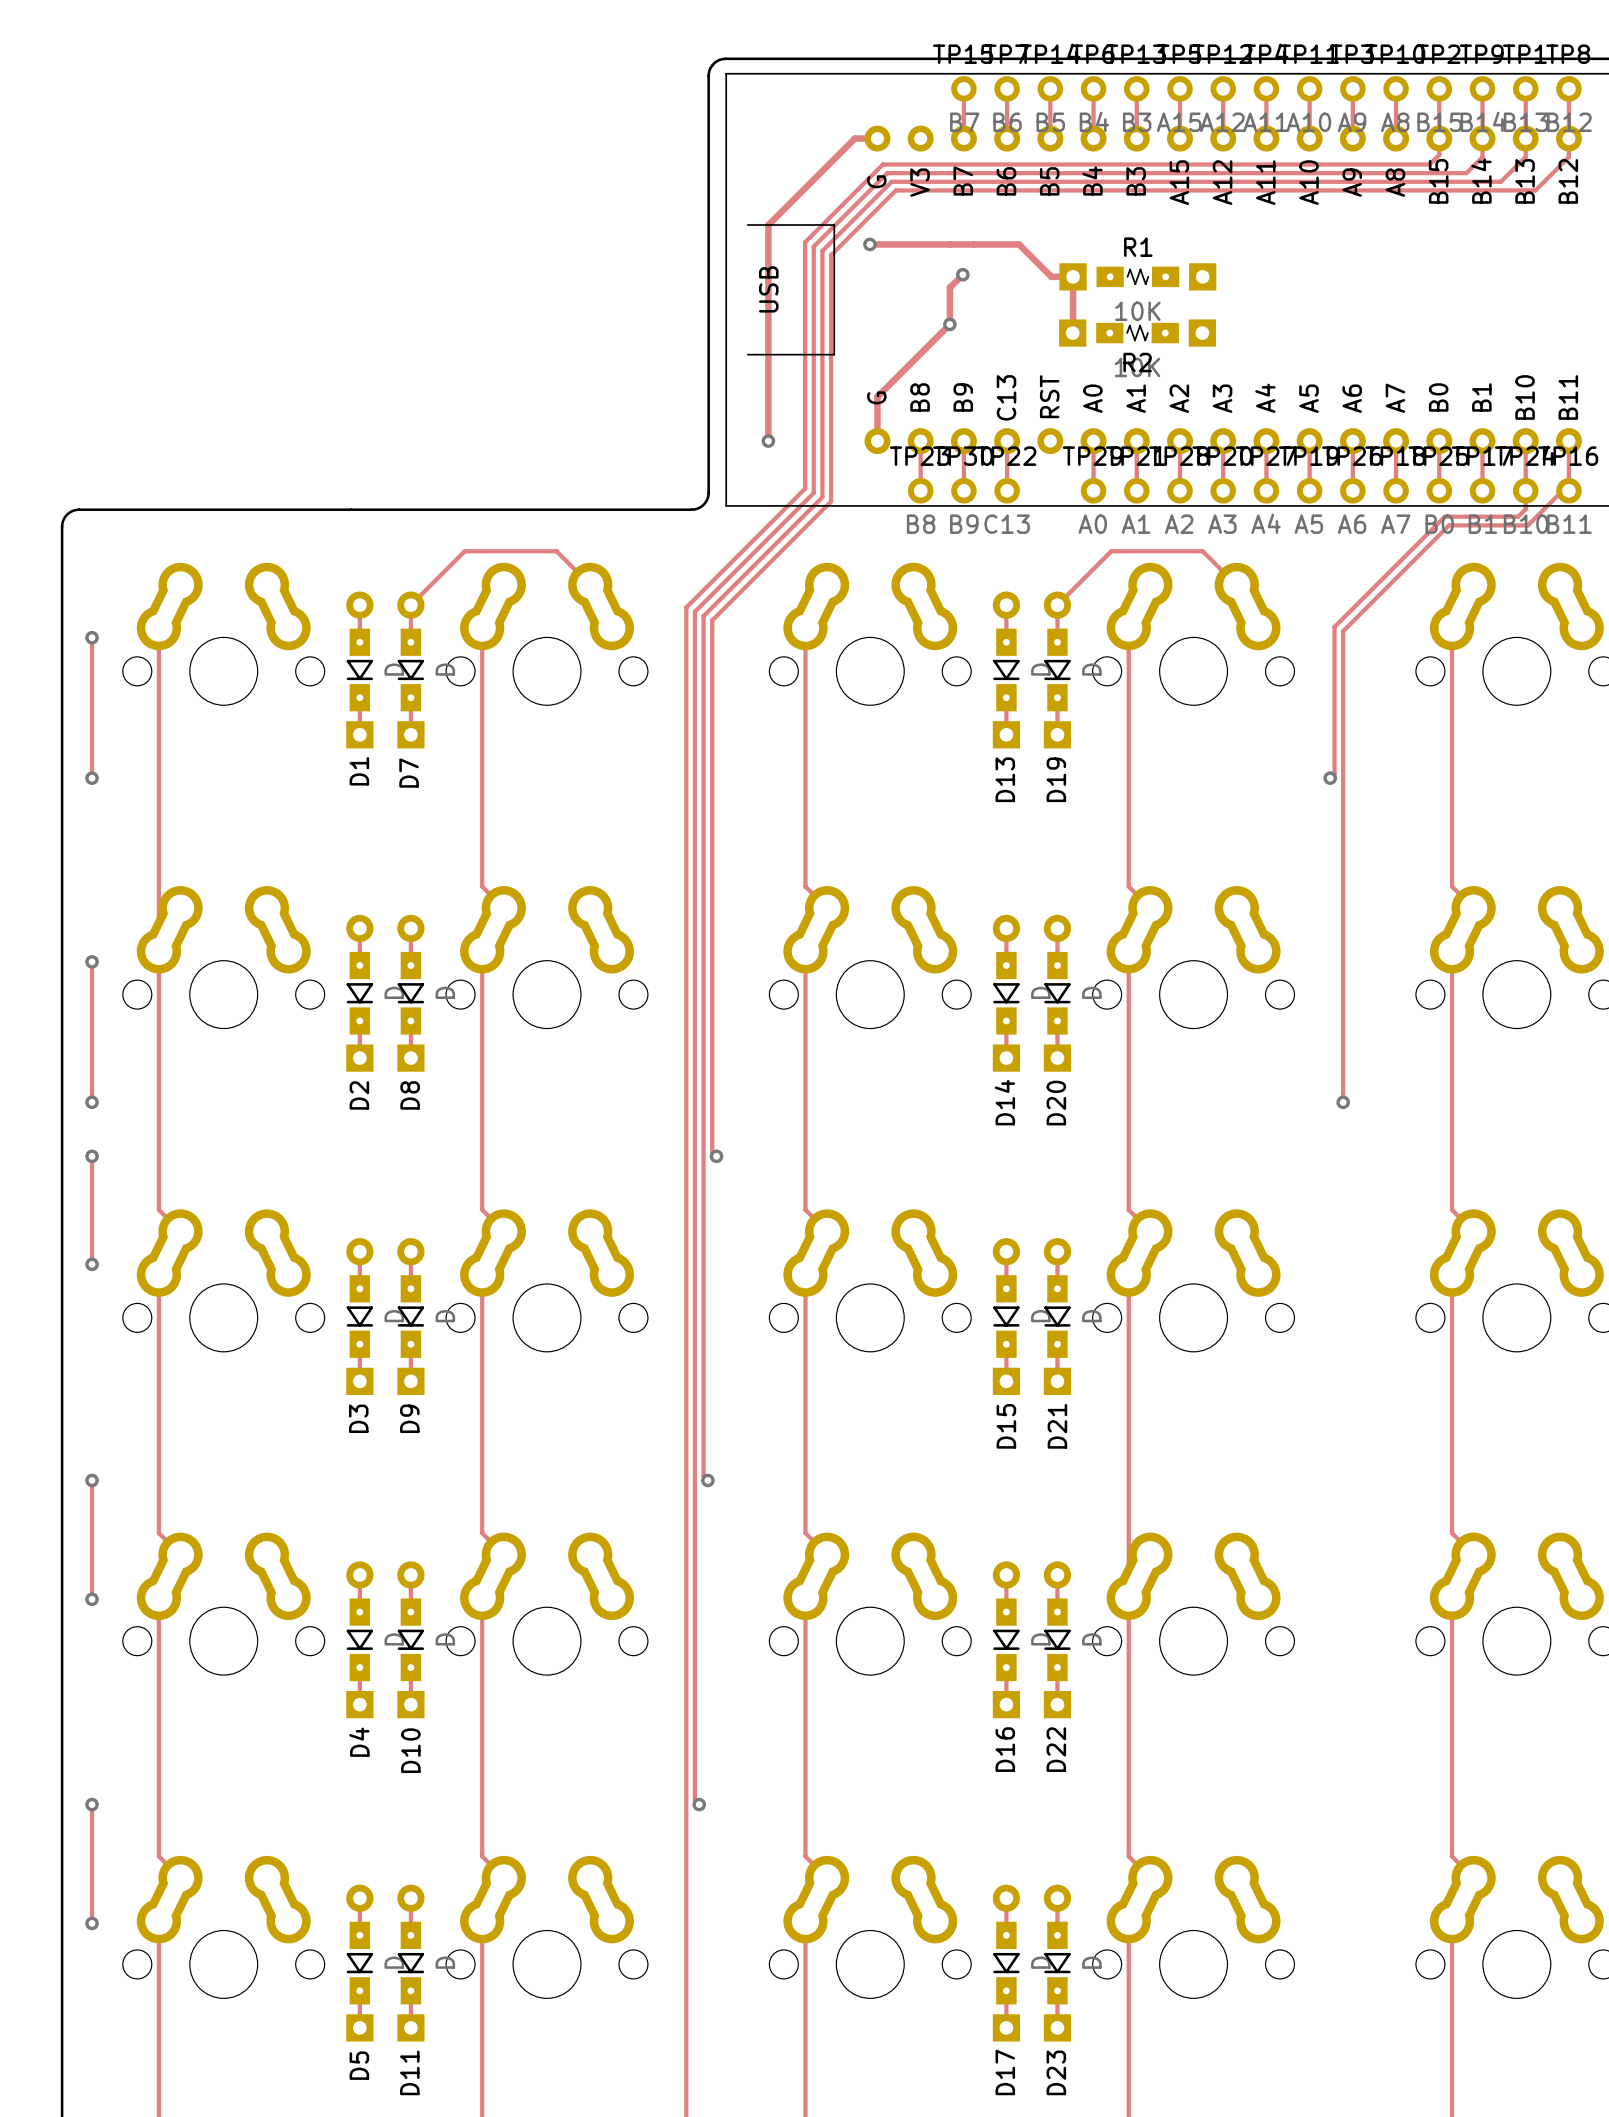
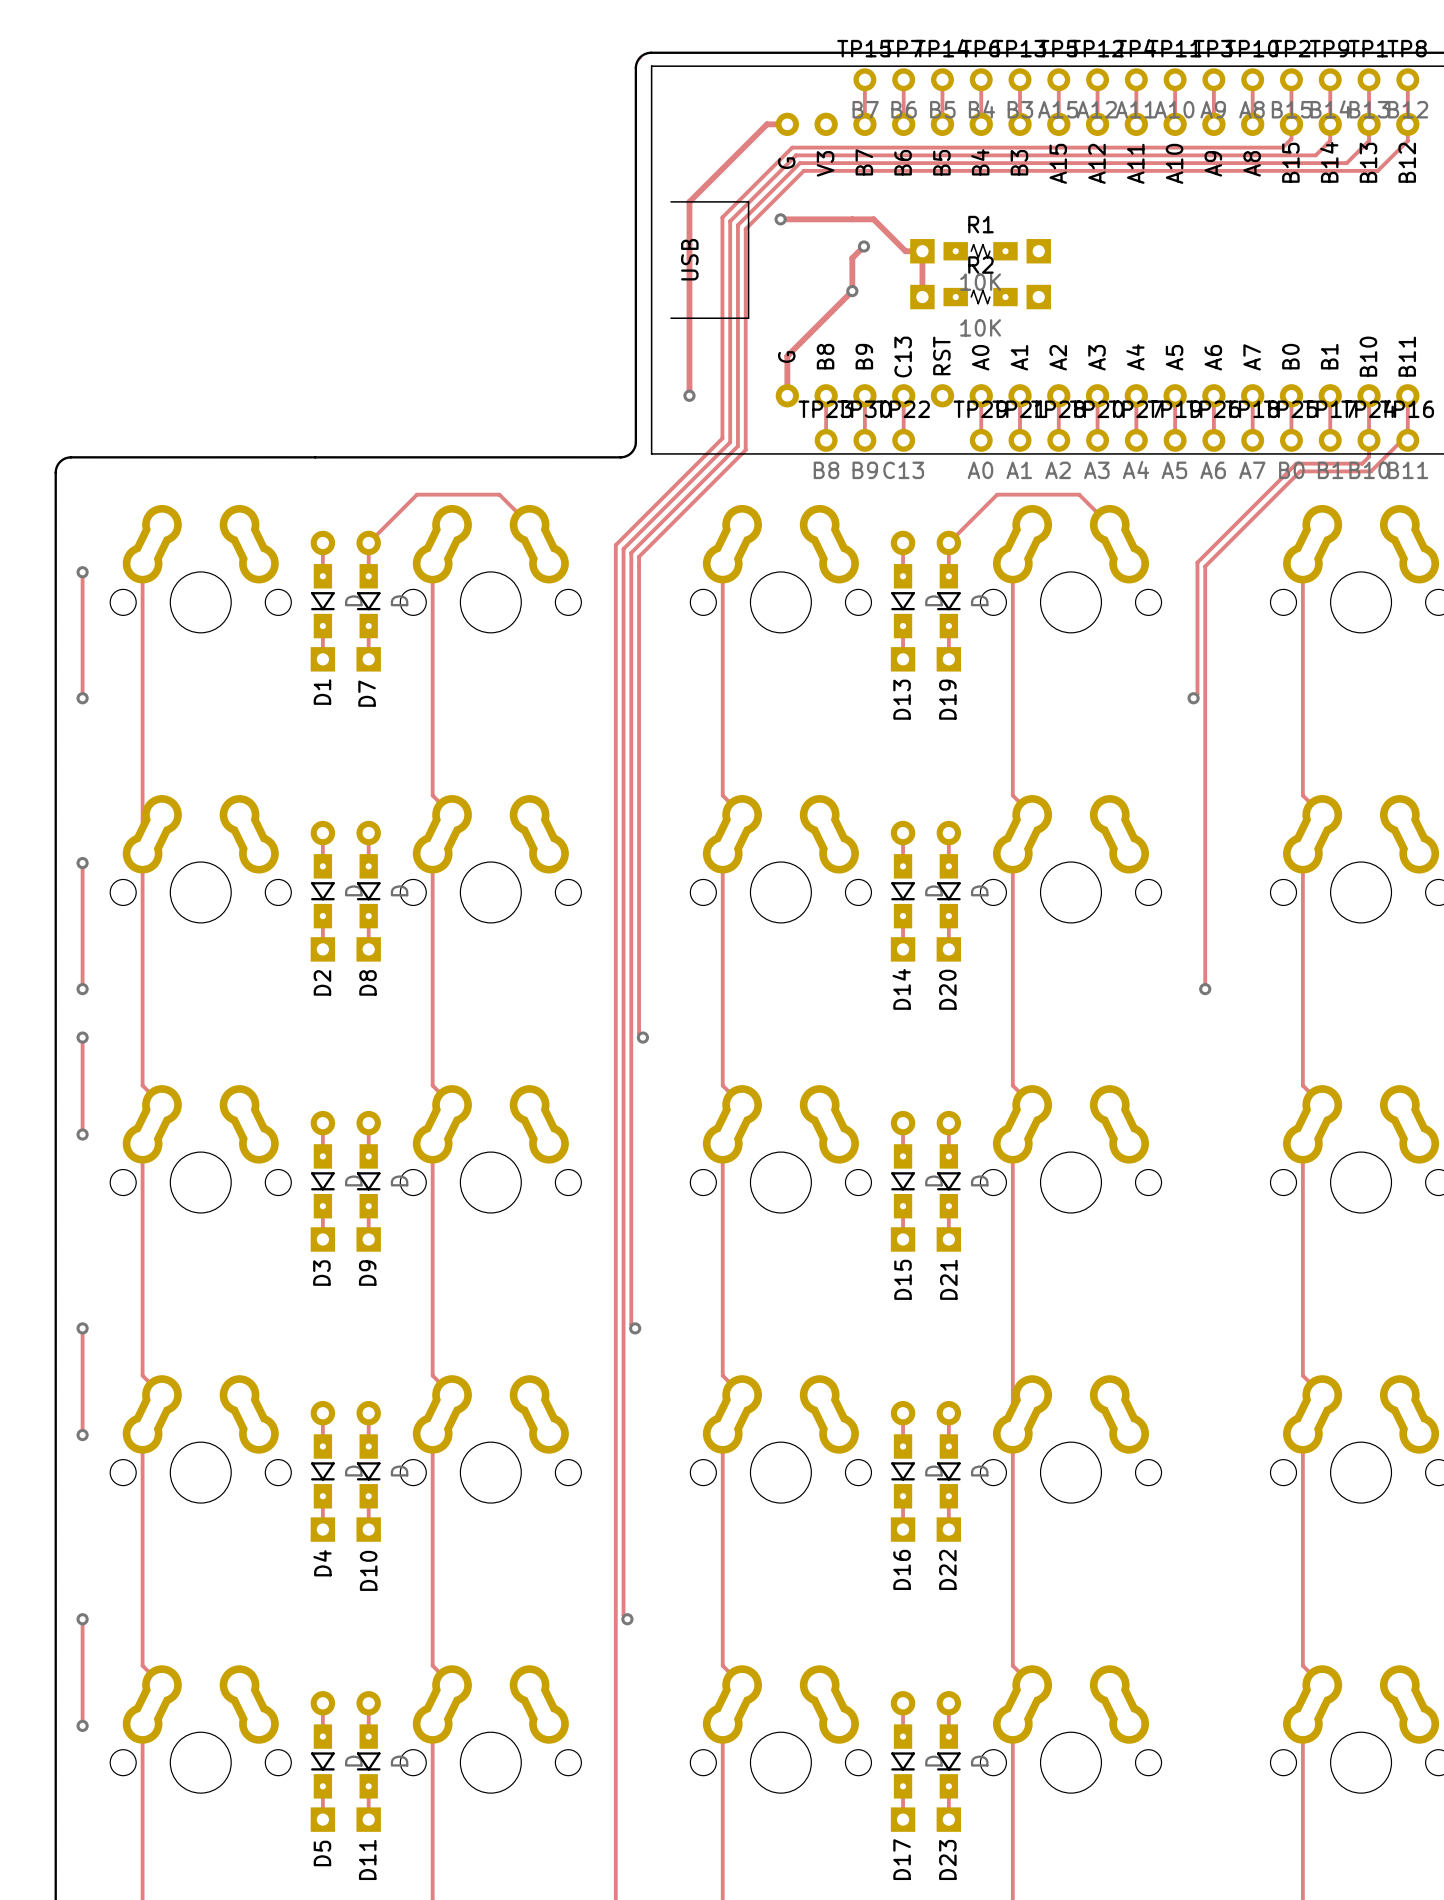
track: (973, 244) (1019, 244) (1051, 276) (1073, 276) (1072, 333) -> (873, 219) (905, 251) (922, 251) (922, 297)
R1 position: (1137, 276) -> (980, 251)
R2 position: (1137, 333) -> (980, 297)
R2 name position: R2 (1137, 362) -> R2 (980, 265)

